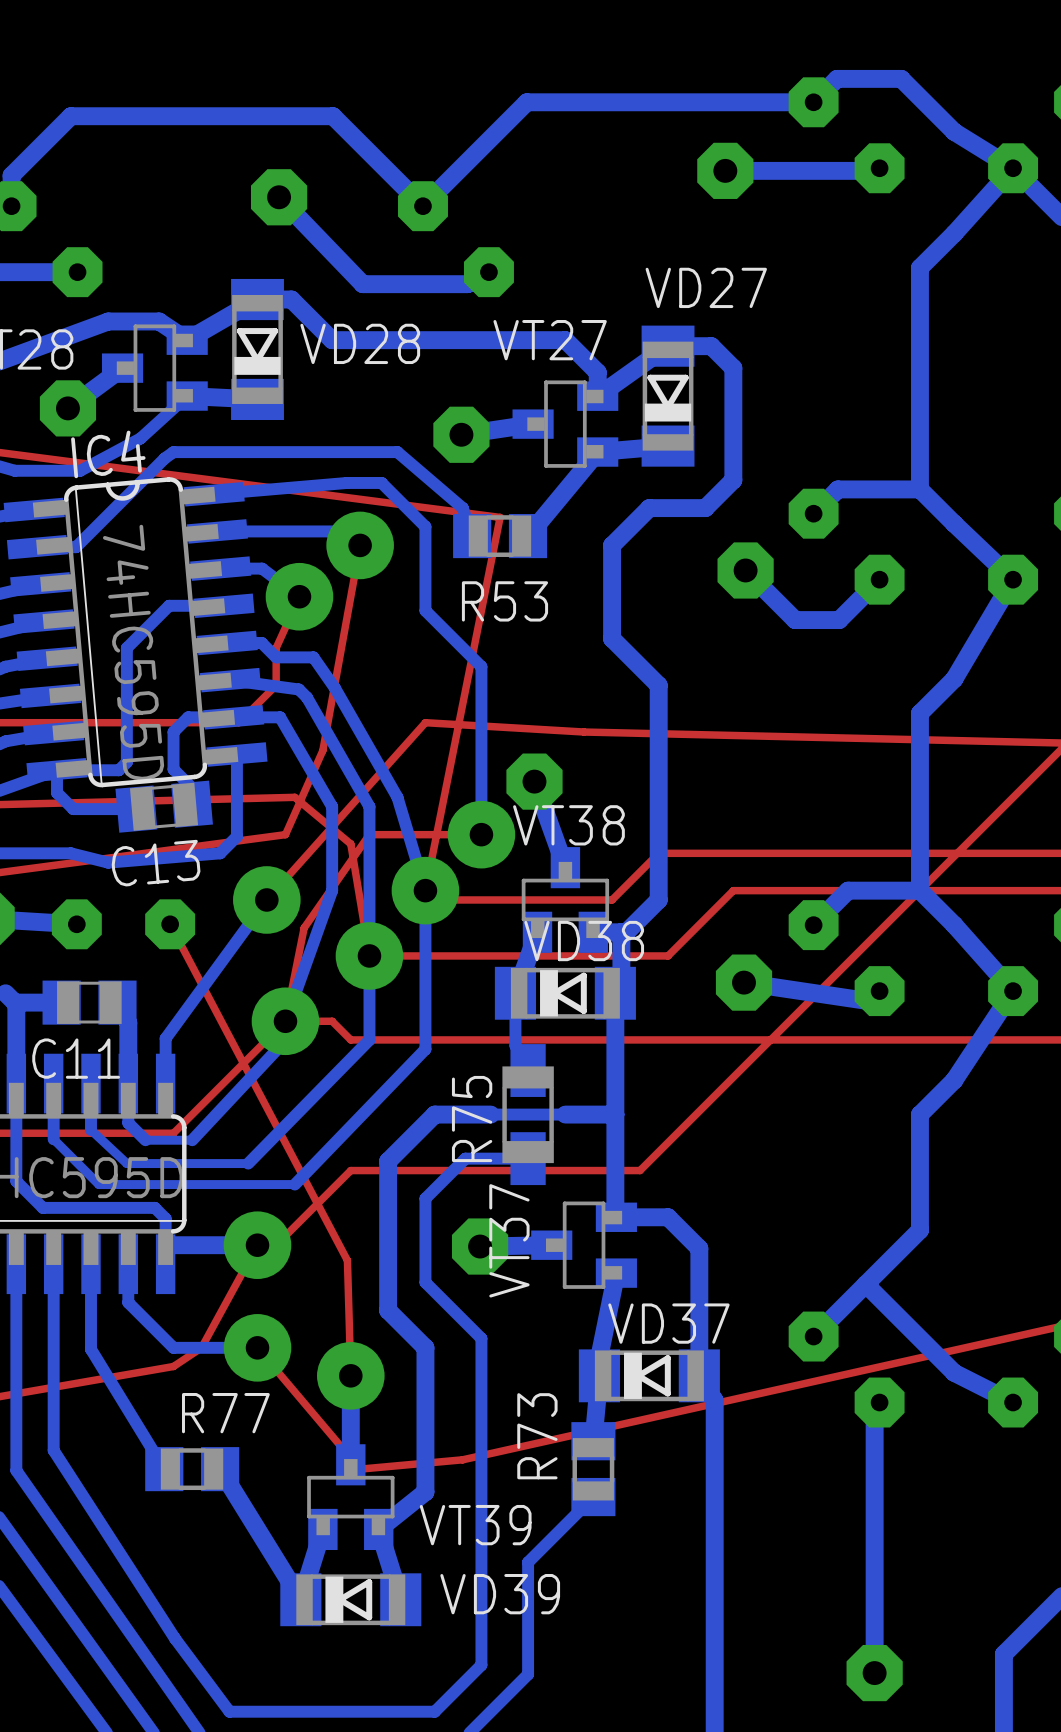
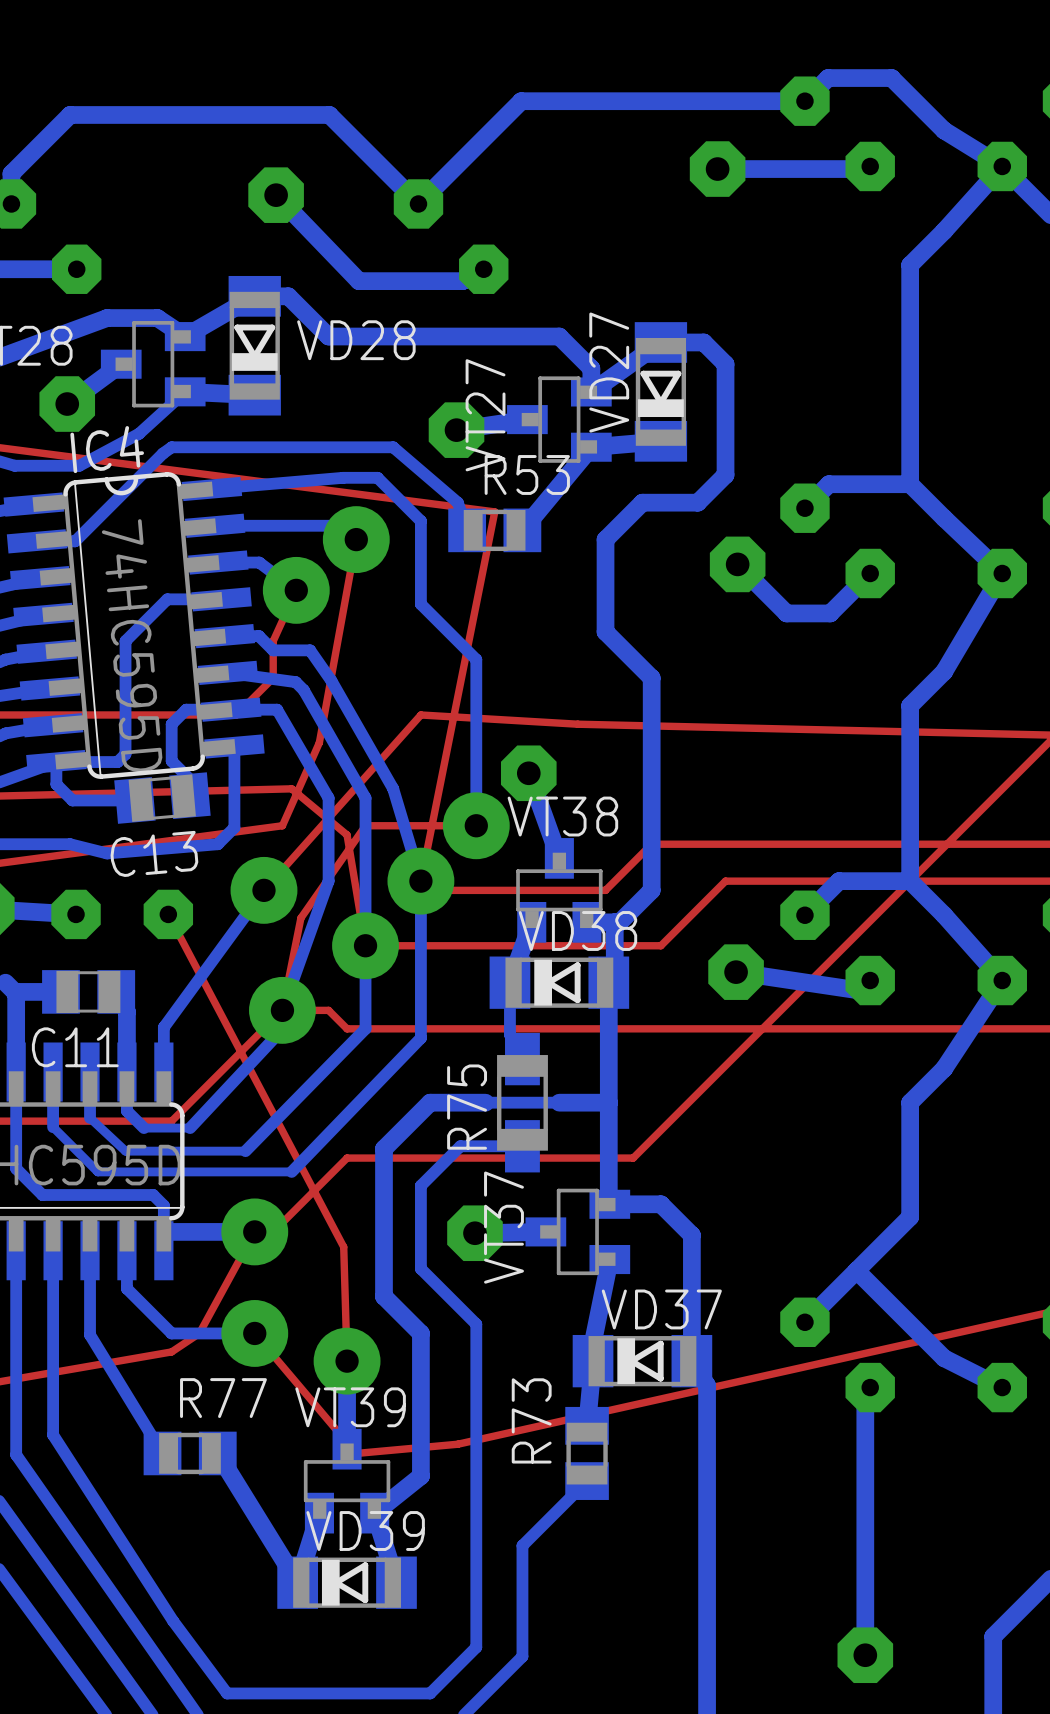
VD27 name rotation: 0° (706, 287) -> 90° counterclockwise (609, 372)
VT27 name rotation: 0° (550, 340) -> 90° counterclockwise (485, 415)
R53 name position: R53 (504, 601) -> R53 (527, 474)
VT39 name position: VT39 (475, 1525) -> VT39 (350, 1407)
VD39 name position: VD39 (500, 1594) -> VD39 (365, 1531)

